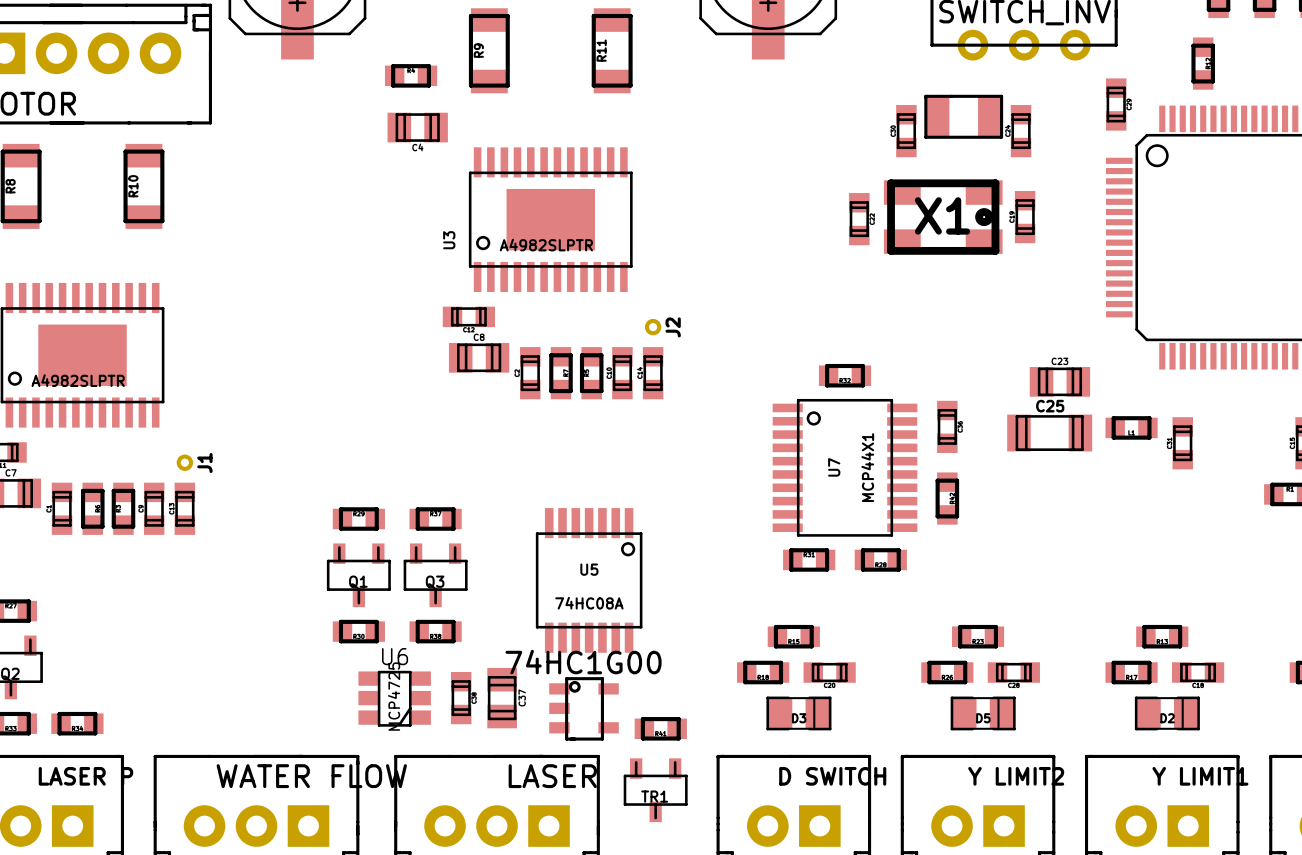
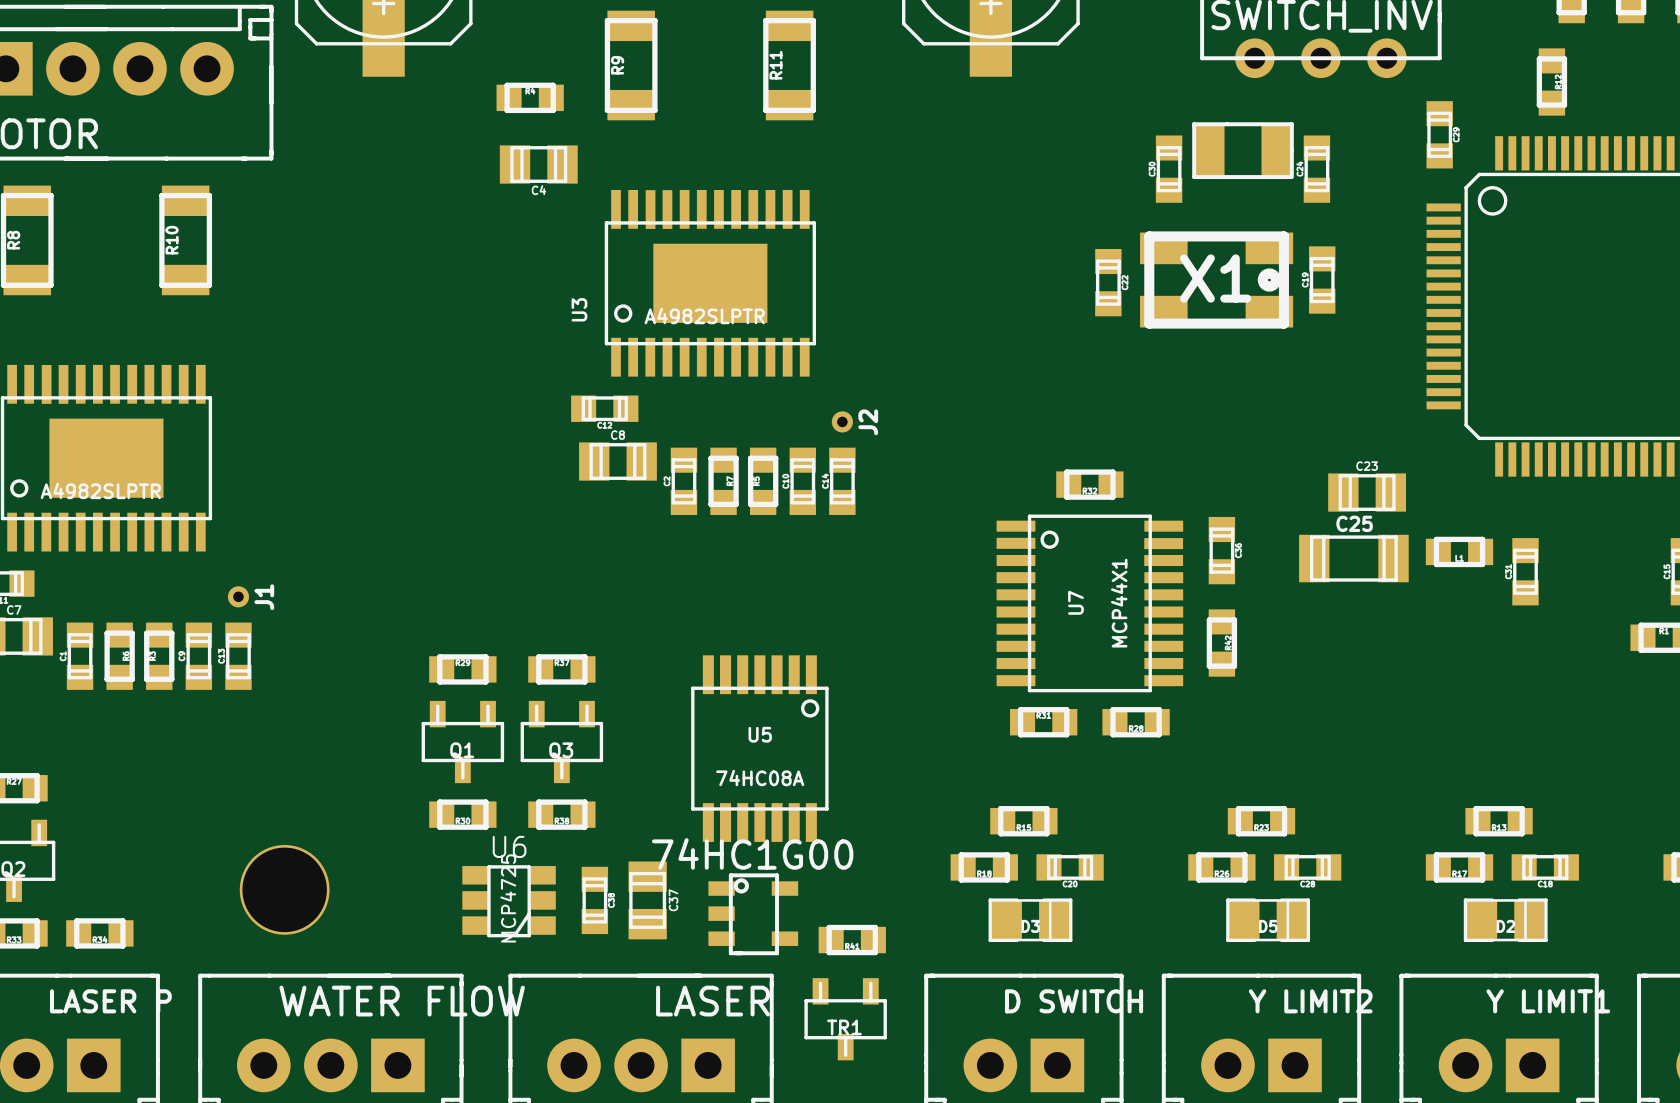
part: none -> (284, 889)

